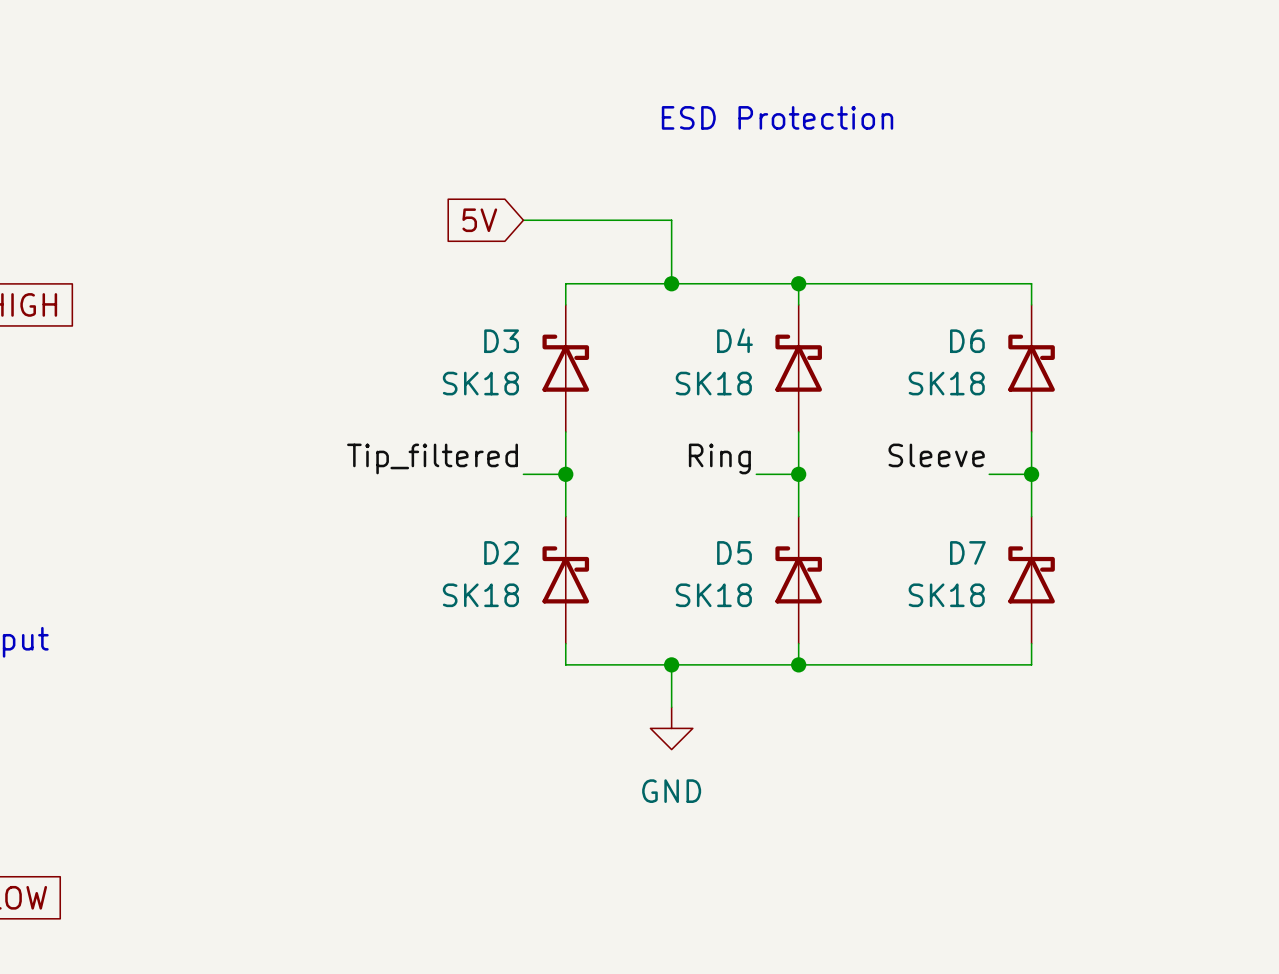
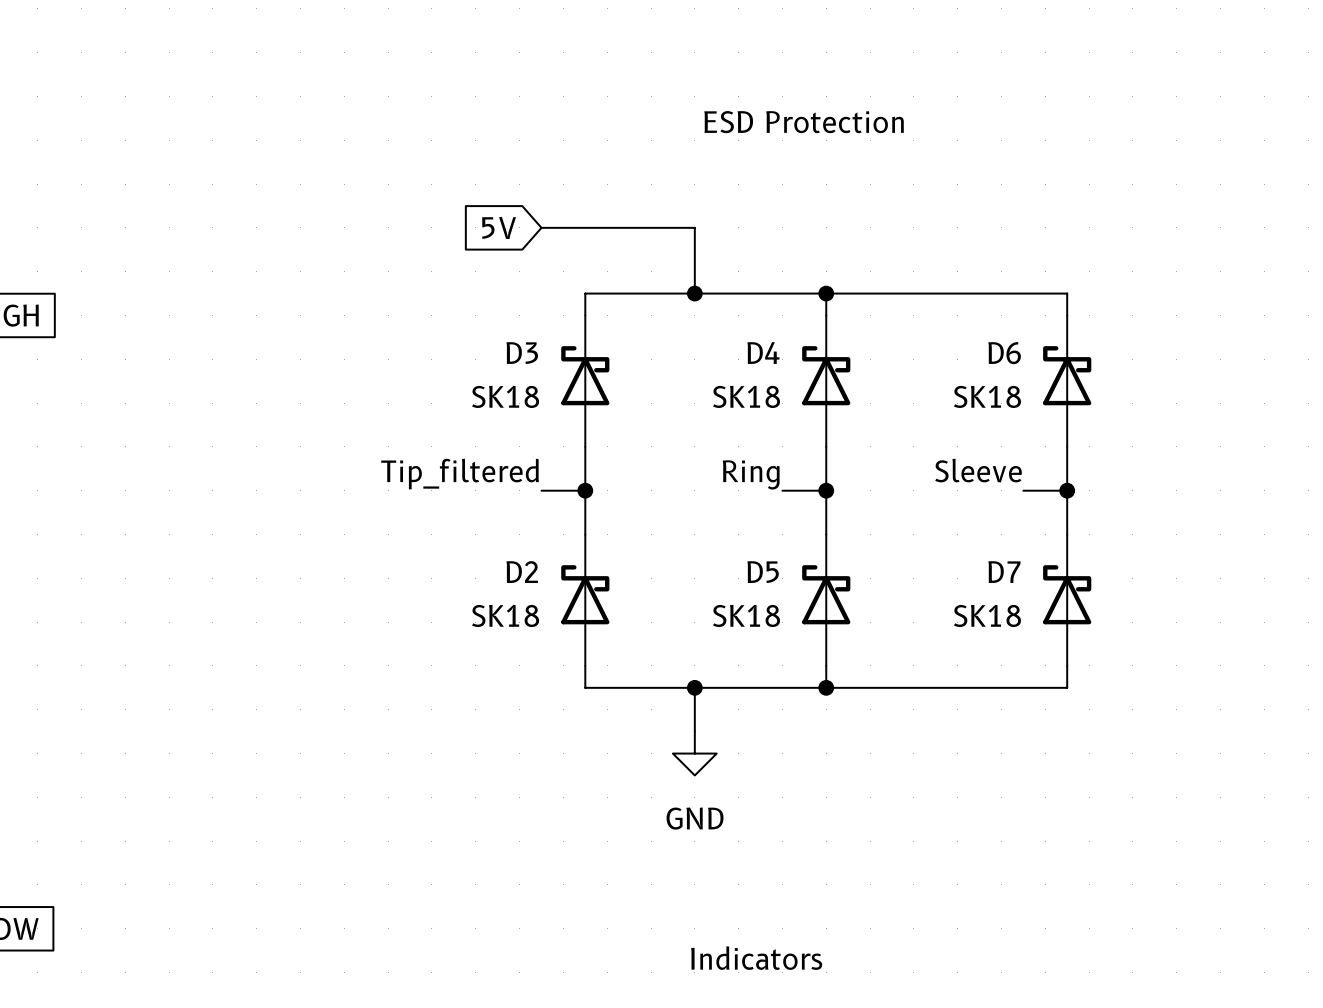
text: none -> Indicators (756, 958)

